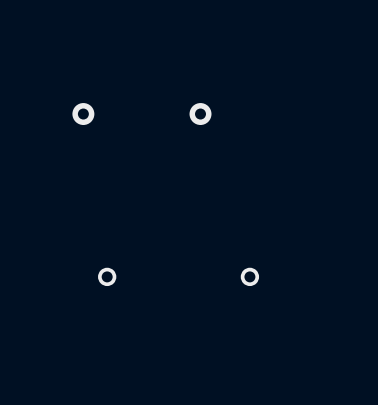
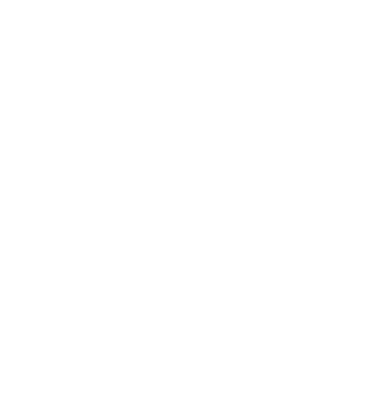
via: (83, 114) -> none
via: (200, 114) -> none
via: (107, 276) -> none
via: (249, 276) -> none

